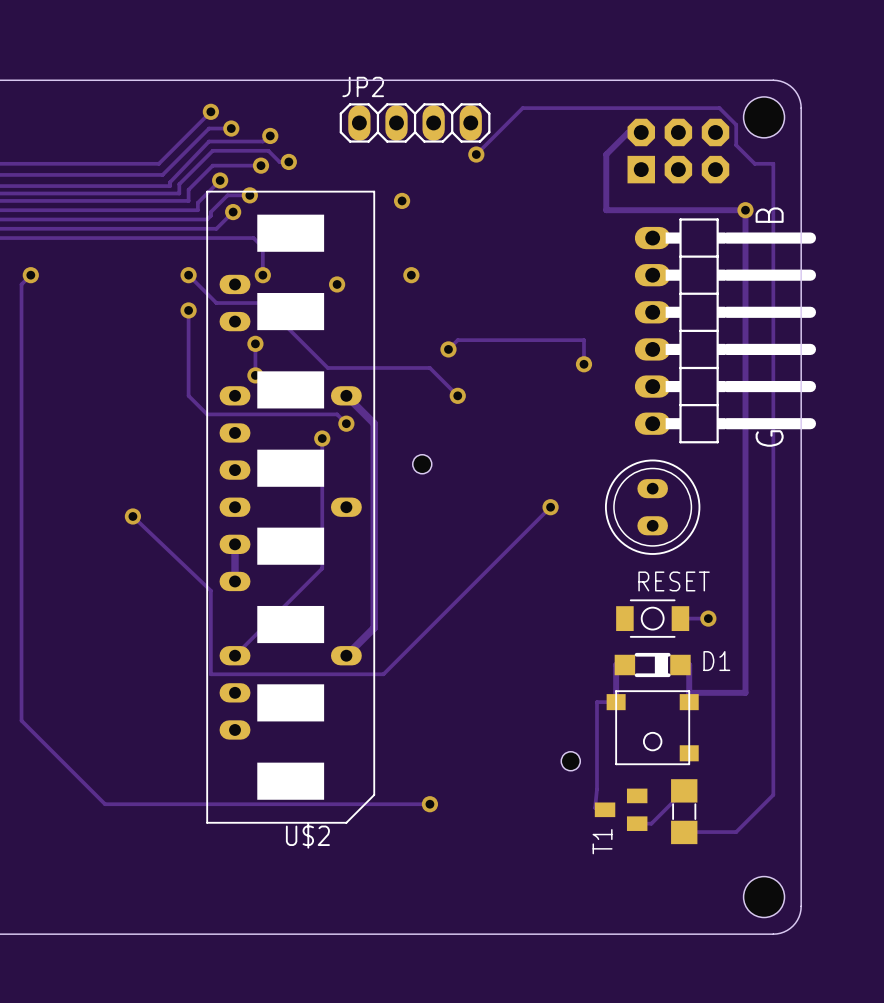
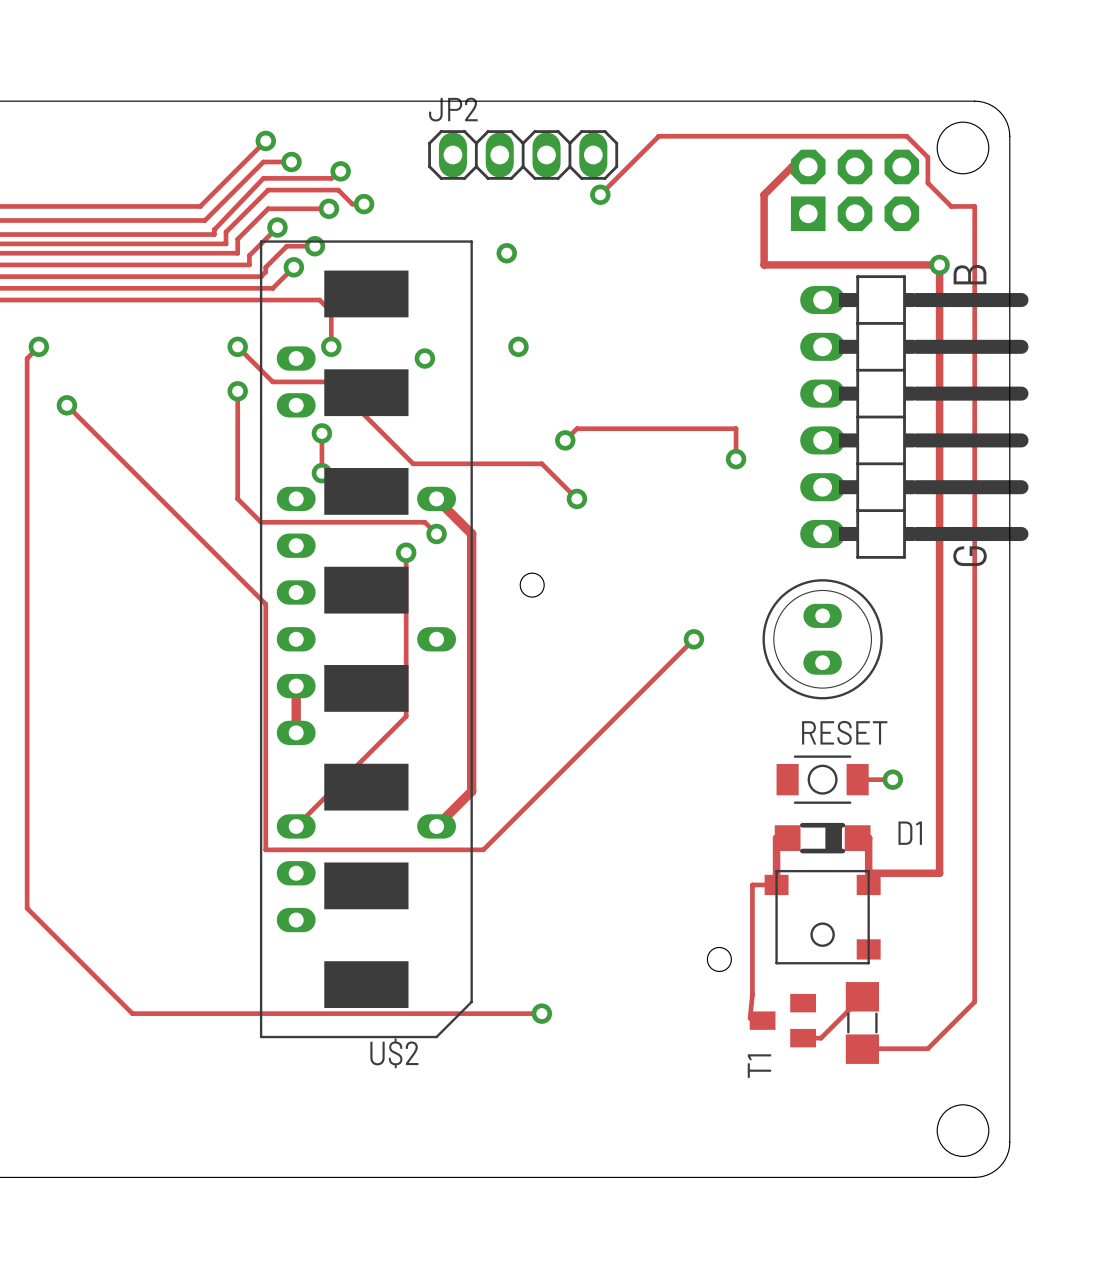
via: none -> (66, 405)
track: (132, 516) (210, 590) -> (66, 405) (265, 604) (265, 744)
via: (132, 516) -> none

